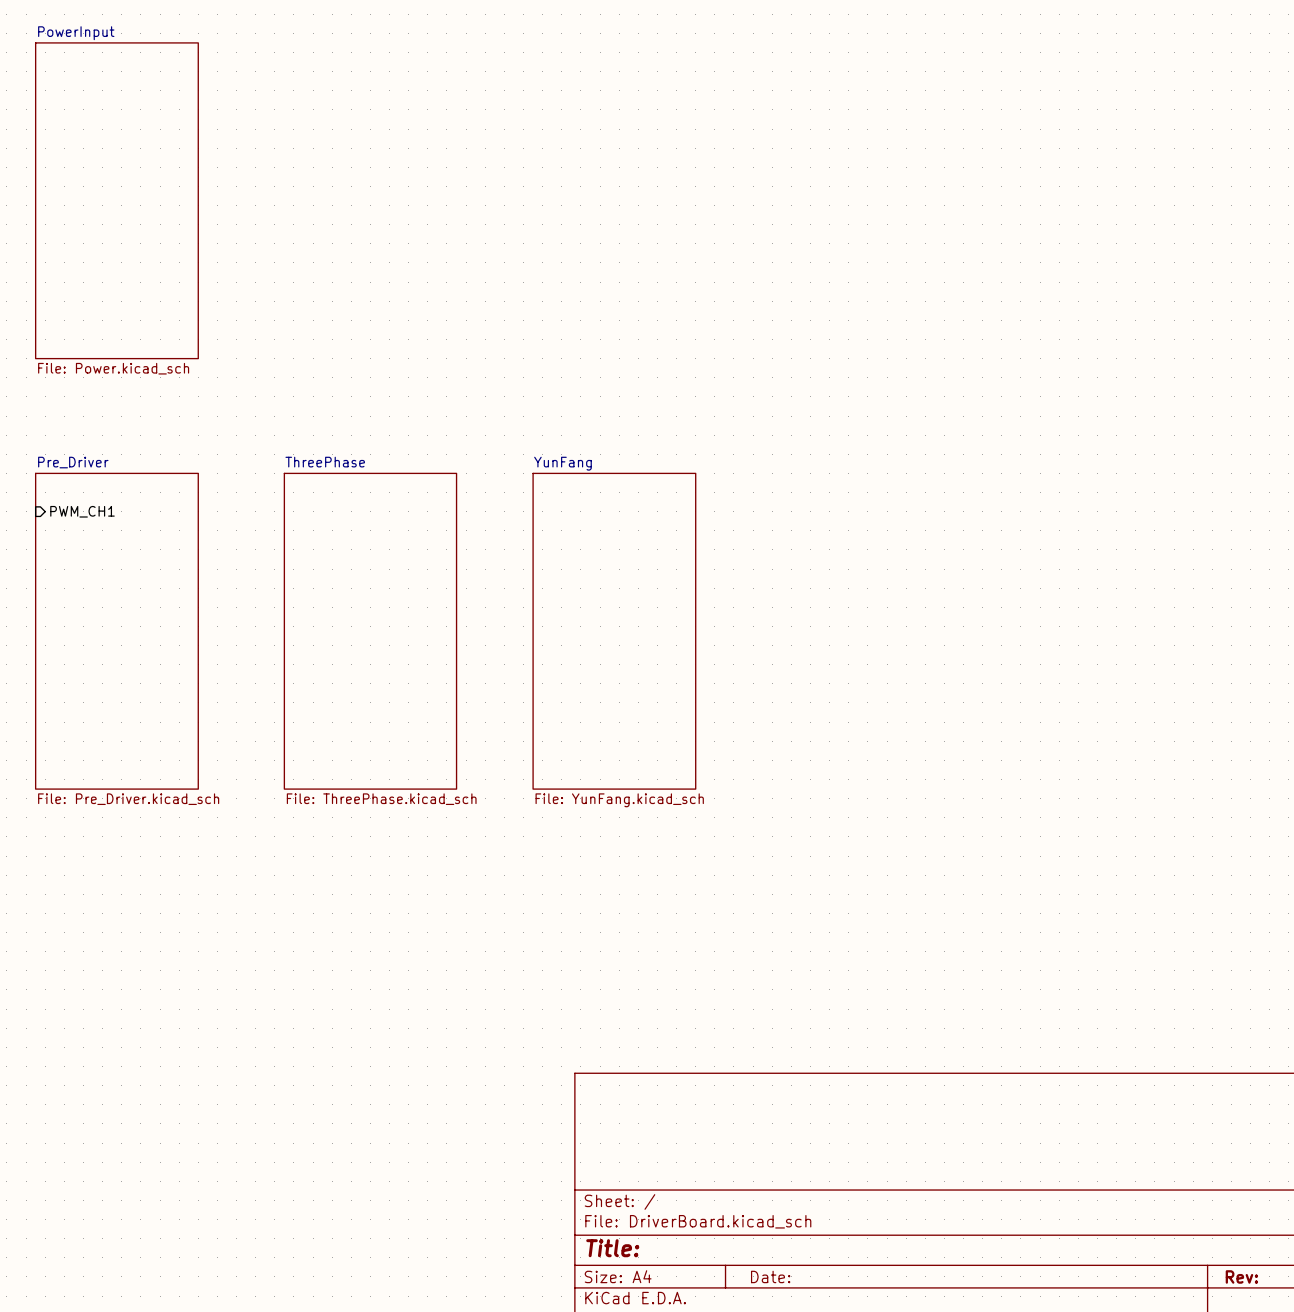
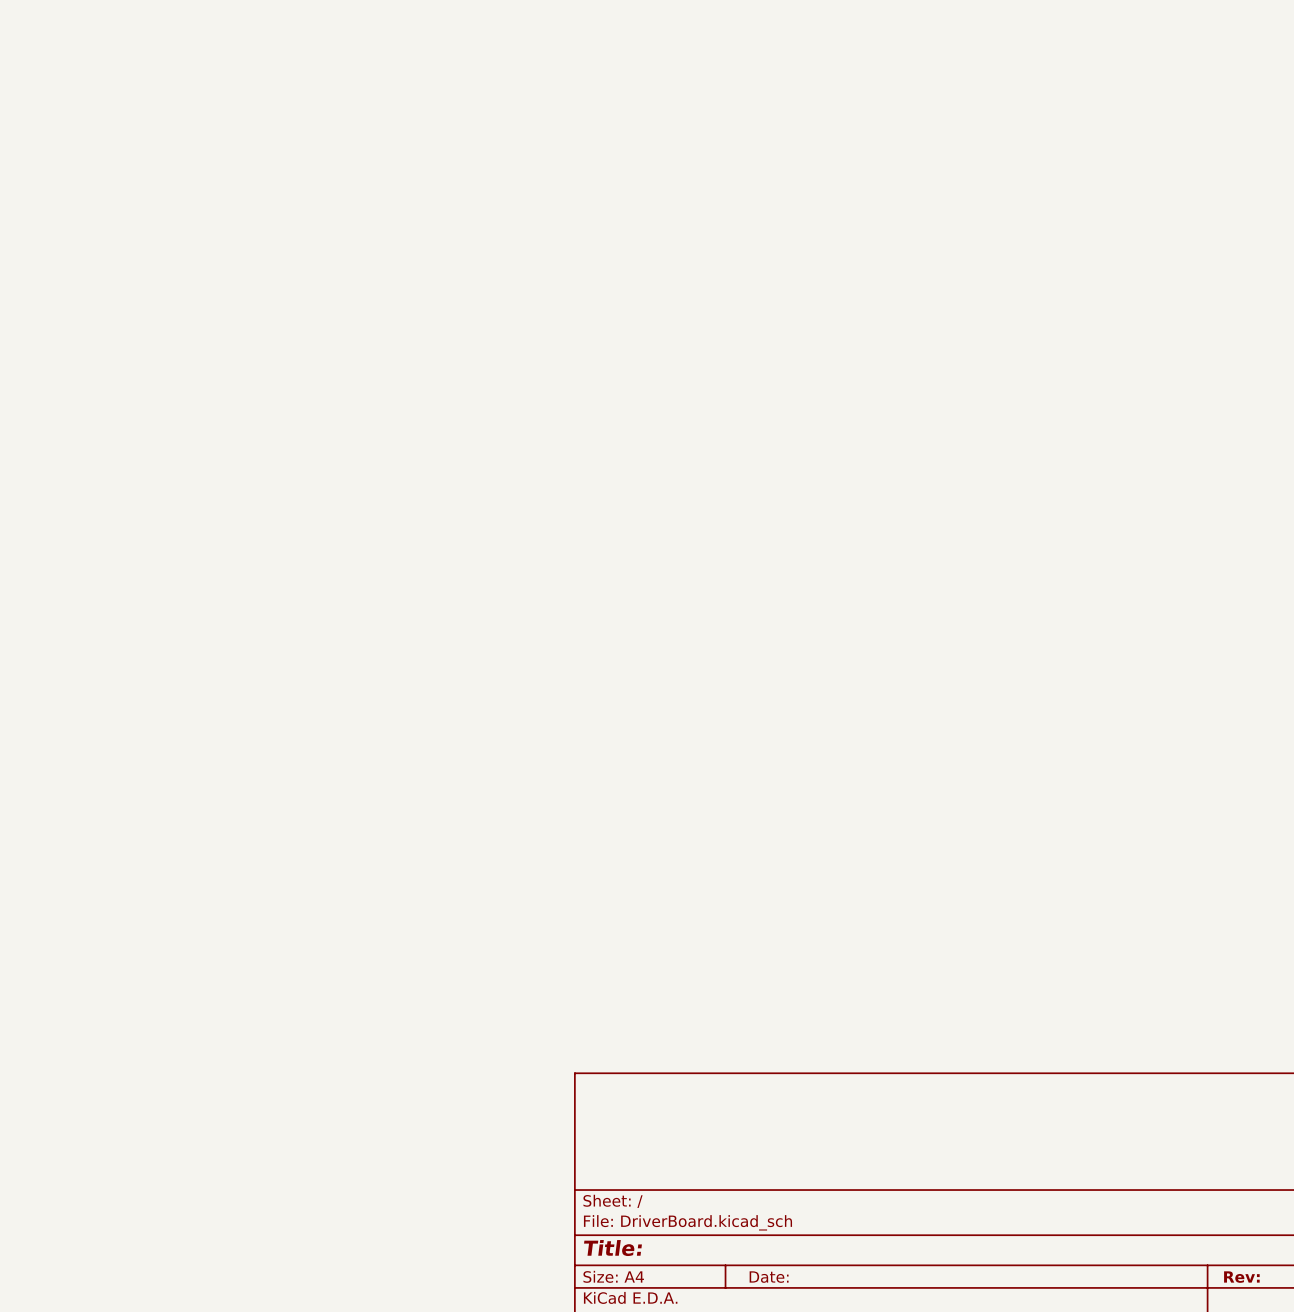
sheet PowerInput: File: Power.kicad_sch (116, 200) -> none
sheet pin: PWM_CH1 (82, 511) -> none
sheet Pre_Driver: File: Pre_Driver.kicad_sch (116, 631) -> none
sheet ThreePhase: File: ThreePhase.kicad_sch (370, 631) -> none
sheet YunFang: File: YunFang.kicad_sch (614, 631) -> none

